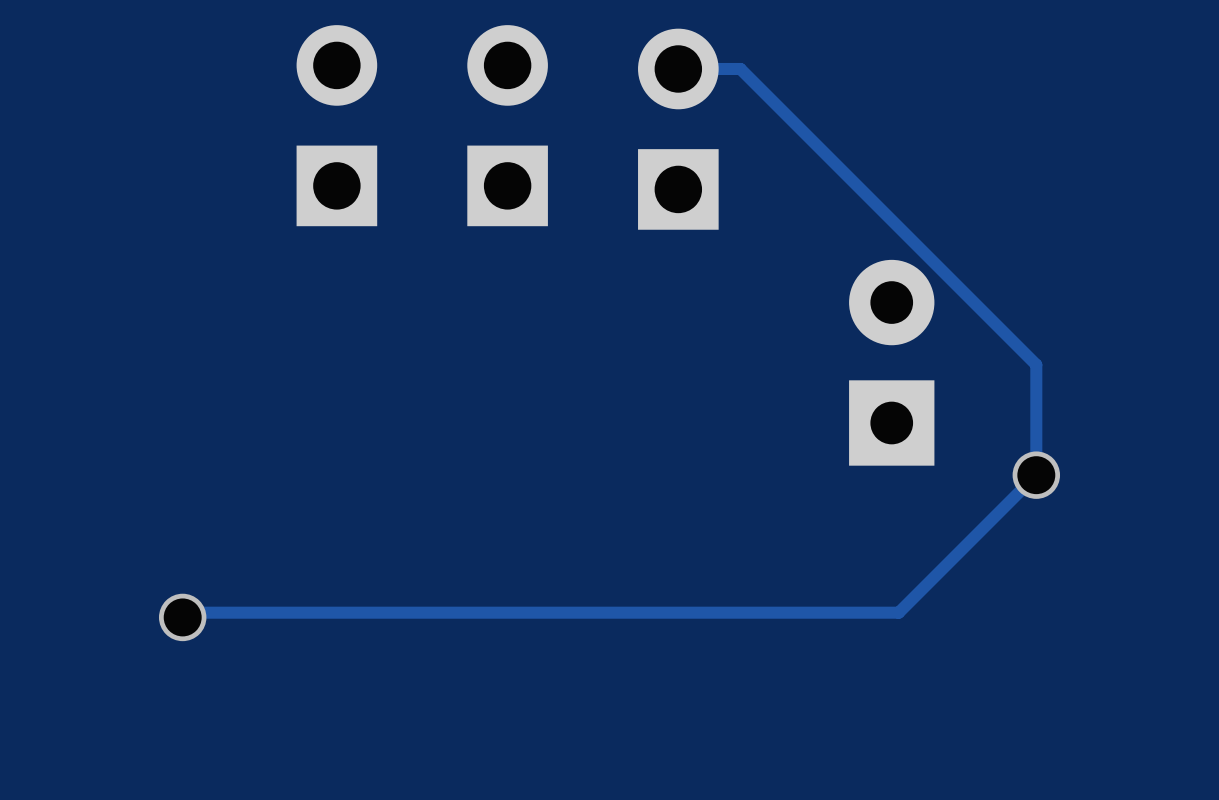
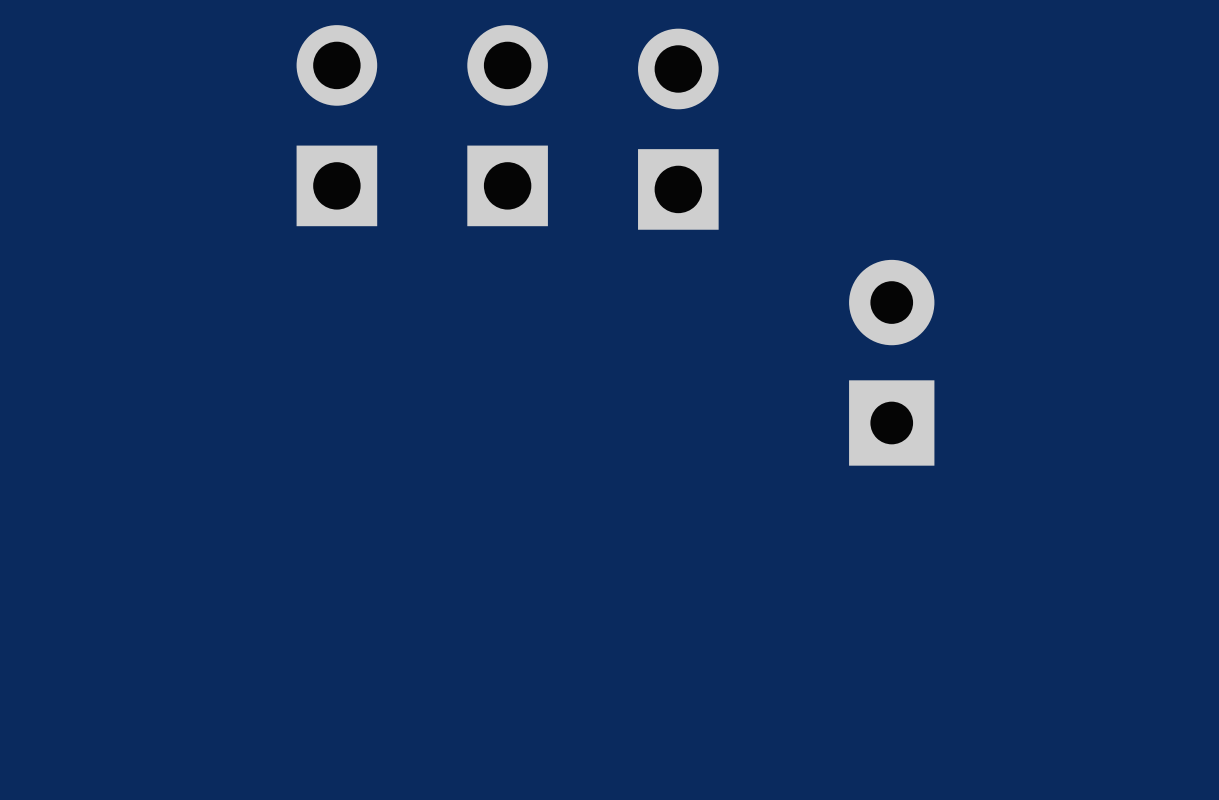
track: (678, 68) (740, 68) (1036, 364) (1036, 475) (898, 612) (187, 612) (182, 617) -> none
via: (1036, 475) -> none
via: (182, 617) -> none

